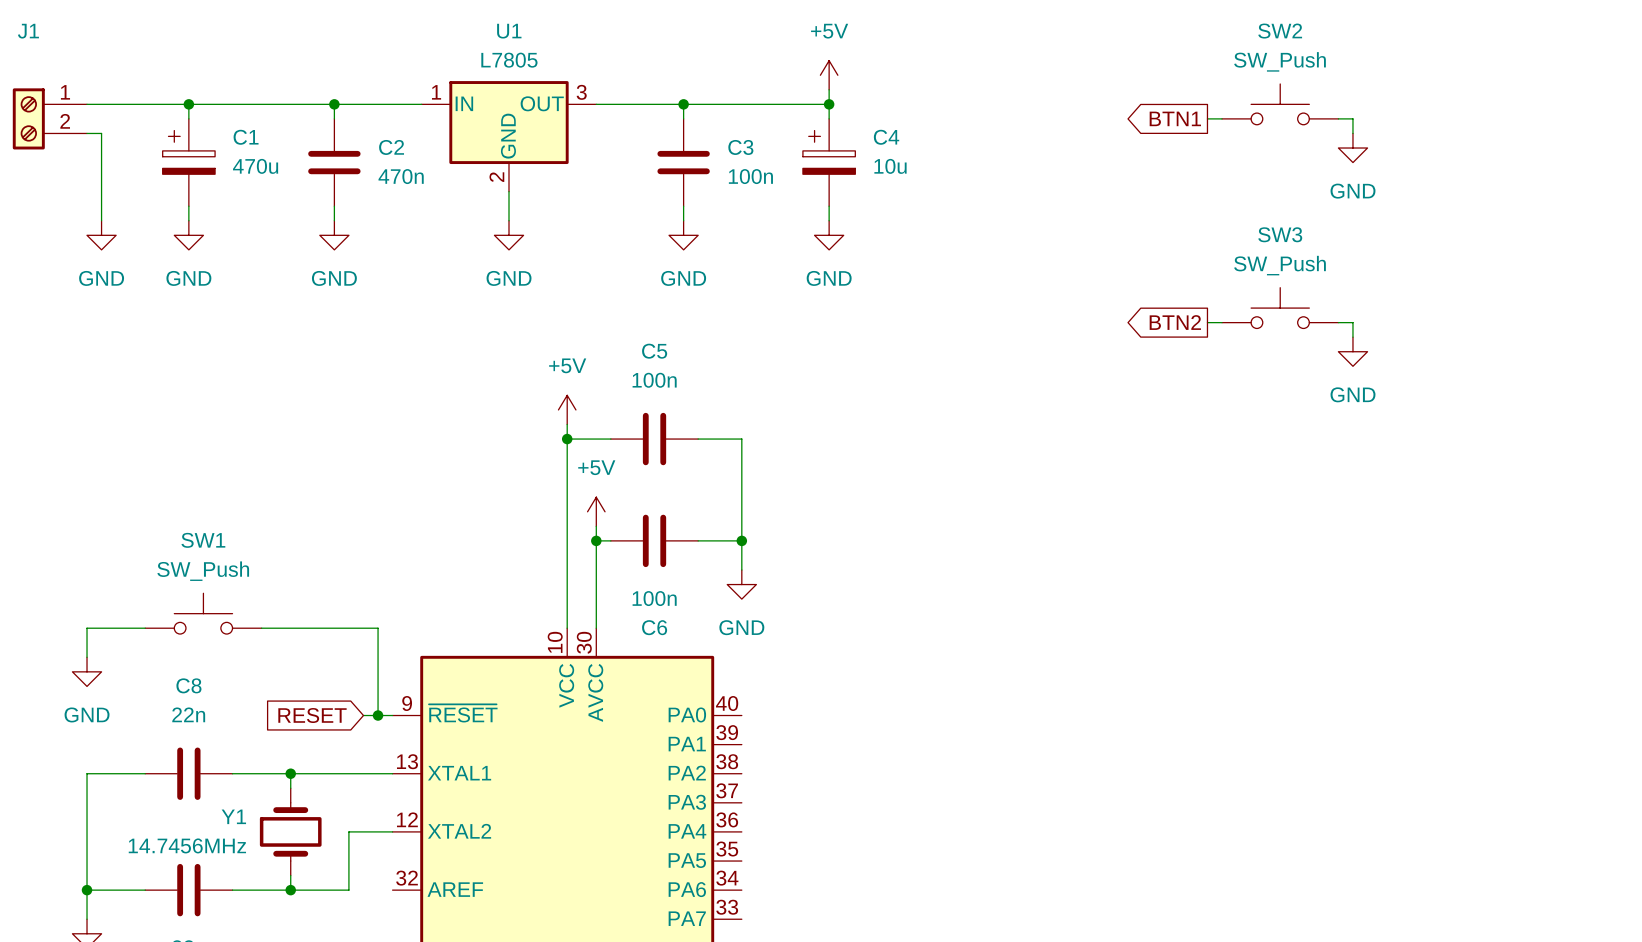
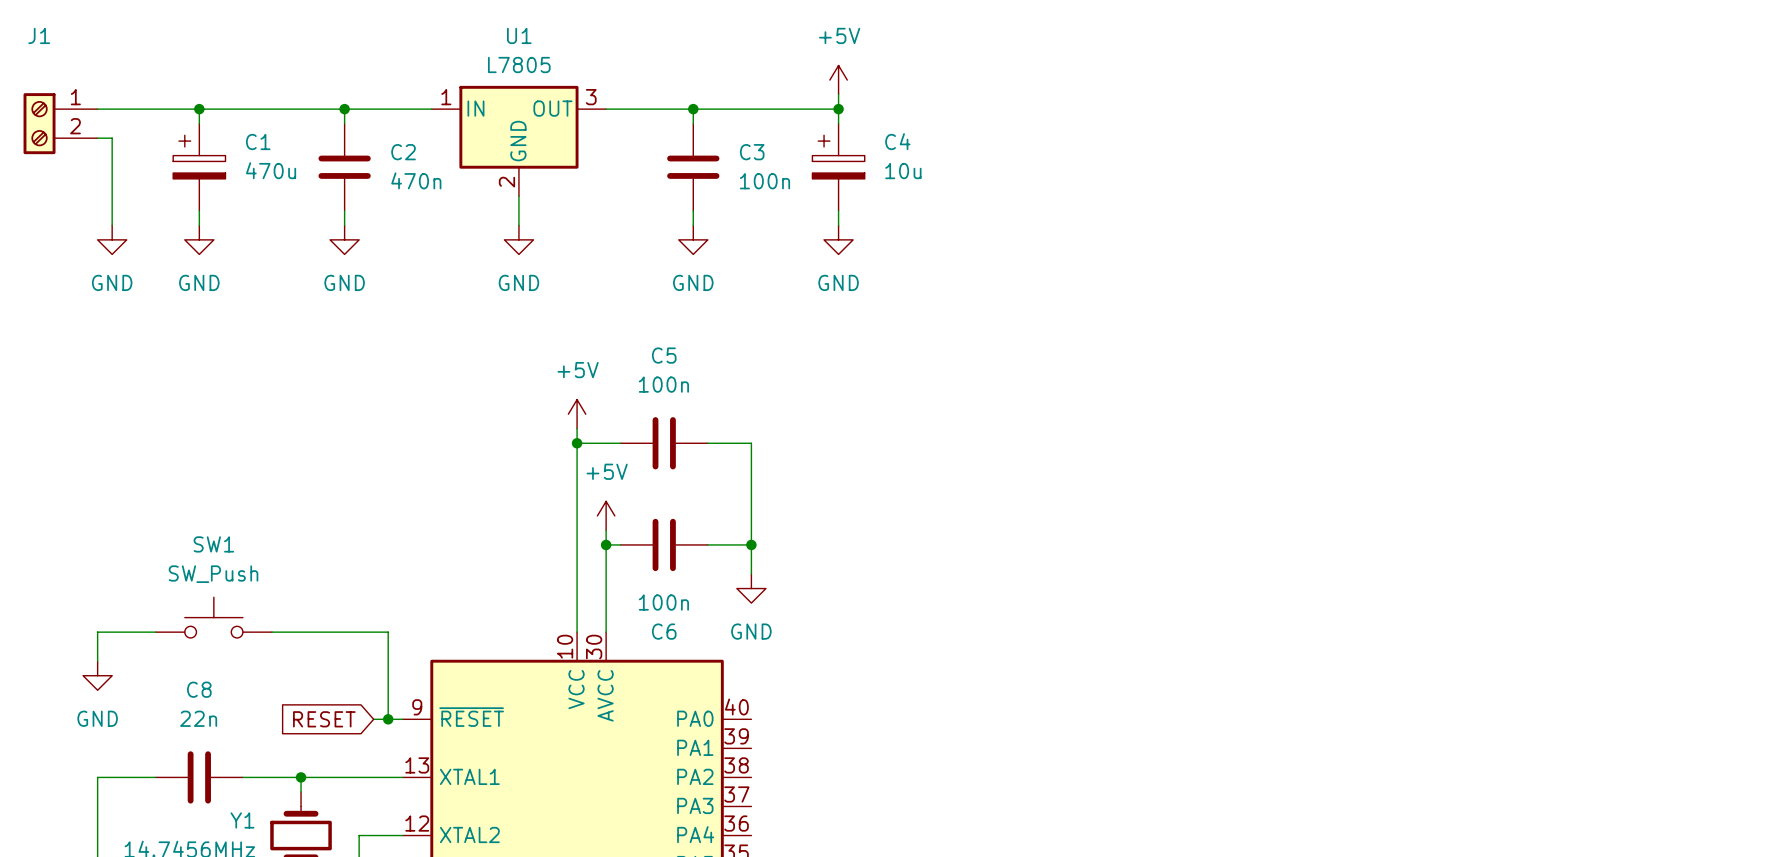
SW2: SW_Push (1280, 104) -> none
global label: BTN1 (1175, 118) -> none
wire: (1207, 118) (1222, 118) -> none
wire: (1338, 118) (1352, 118) (1352, 133) -> none
power symbol: GND (1352, 148) -> none
SW3: SW_Push (1280, 308) -> none
global label: BTN2 (1175, 322) -> none
wire: (1207, 322) (1222, 322) -> none
wire: (1338, 322) (1352, 322) (1352, 337) -> none
power symbol: GND (1352, 351) -> none

